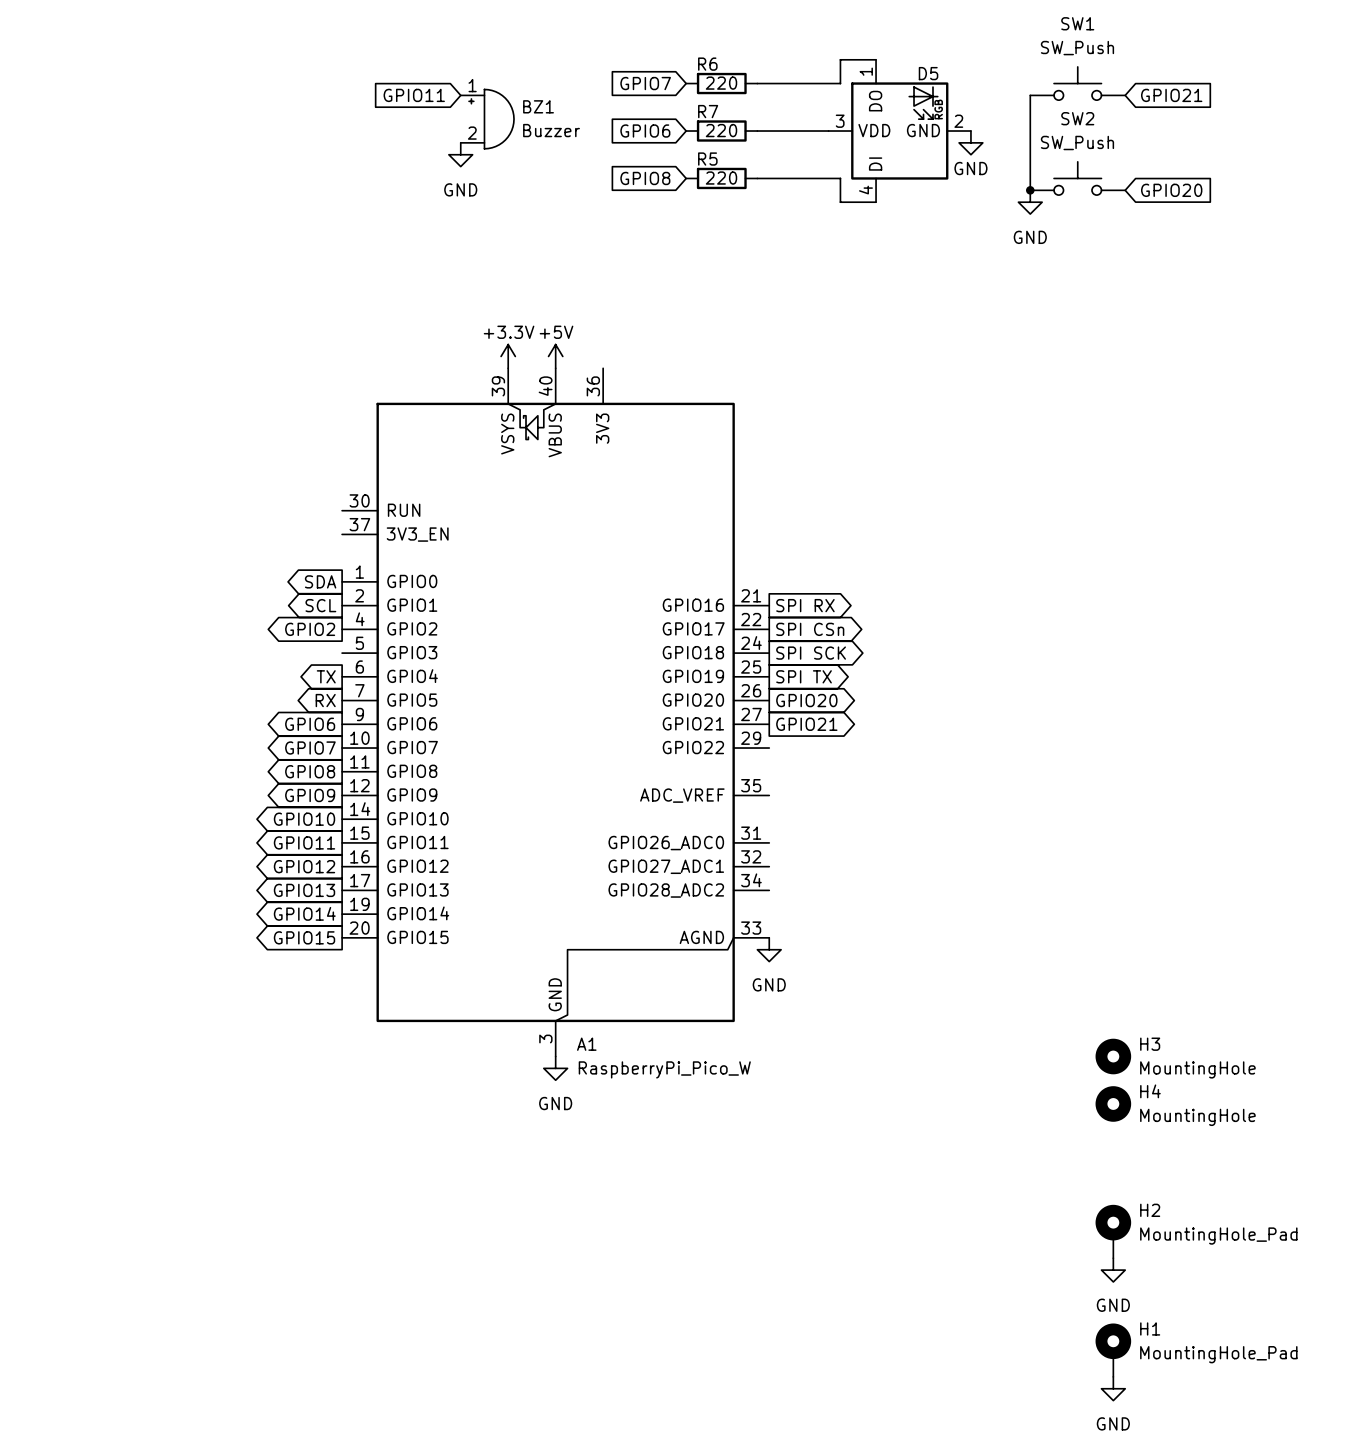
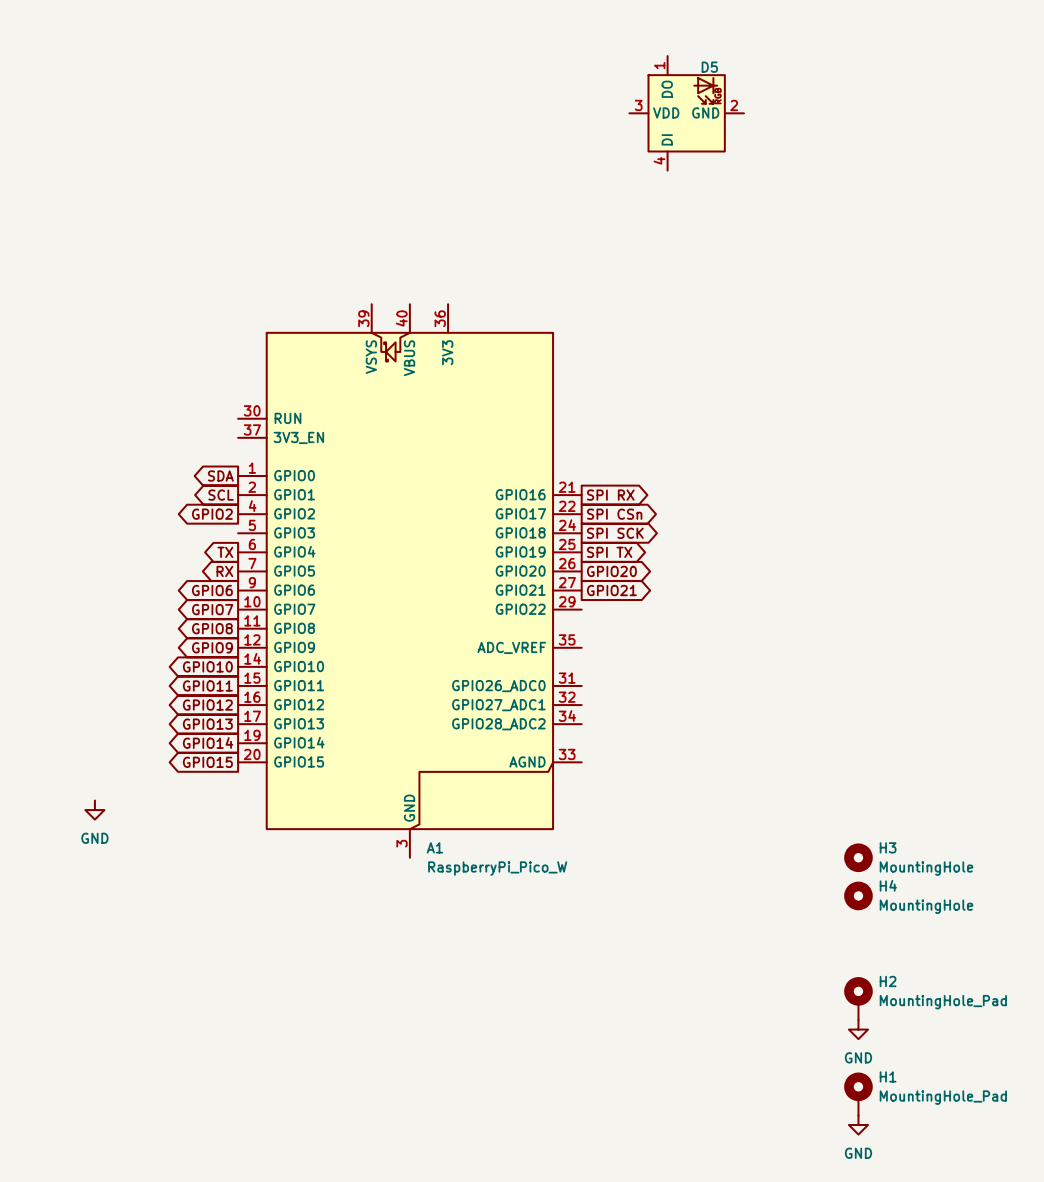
wire: (876, 59) (840, 59) (840, 83) (757, 83) -> none
global label: GPIO7 (645, 83) -> none
R6: 220 (721, 83) -> none
SW1: SW_Push (1077, 83) -> none
global label: GPIO11 (414, 95) -> none
wire: (1030, 95) (1030, 190) -> none
global label: GPIO21 (1171, 95) -> none
BZ1: Buzzer (487, 119) -> none
global label: GPIO6 (645, 131) -> none
R7: 220 (721, 131) -> none
wire: (757, 131) (828, 131) -> none
power symbol: GND (970, 142) -> none
power symbol: GND (460, 154) -> none
global label: GPIO8 (645, 178) -> none
R5: 220 (721, 178) -> none
wire: (757, 178) (840, 178) (840, 202) (876, 202) -> none
SW2: SW_Push (1077, 178) -> none
junction: (1030, 190) -> none
global label: GPIO20 (1171, 190) -> none
power symbol: GND (1030, 202) -> none
power symbol: +3.3V (508, 356) -> none
power symbol: +5V (555, 356) -> none
power symbol: GND (769, 949) -> none
power symbol: none -> GND (94, 810)
power symbol: GND (555, 1068) -> none

